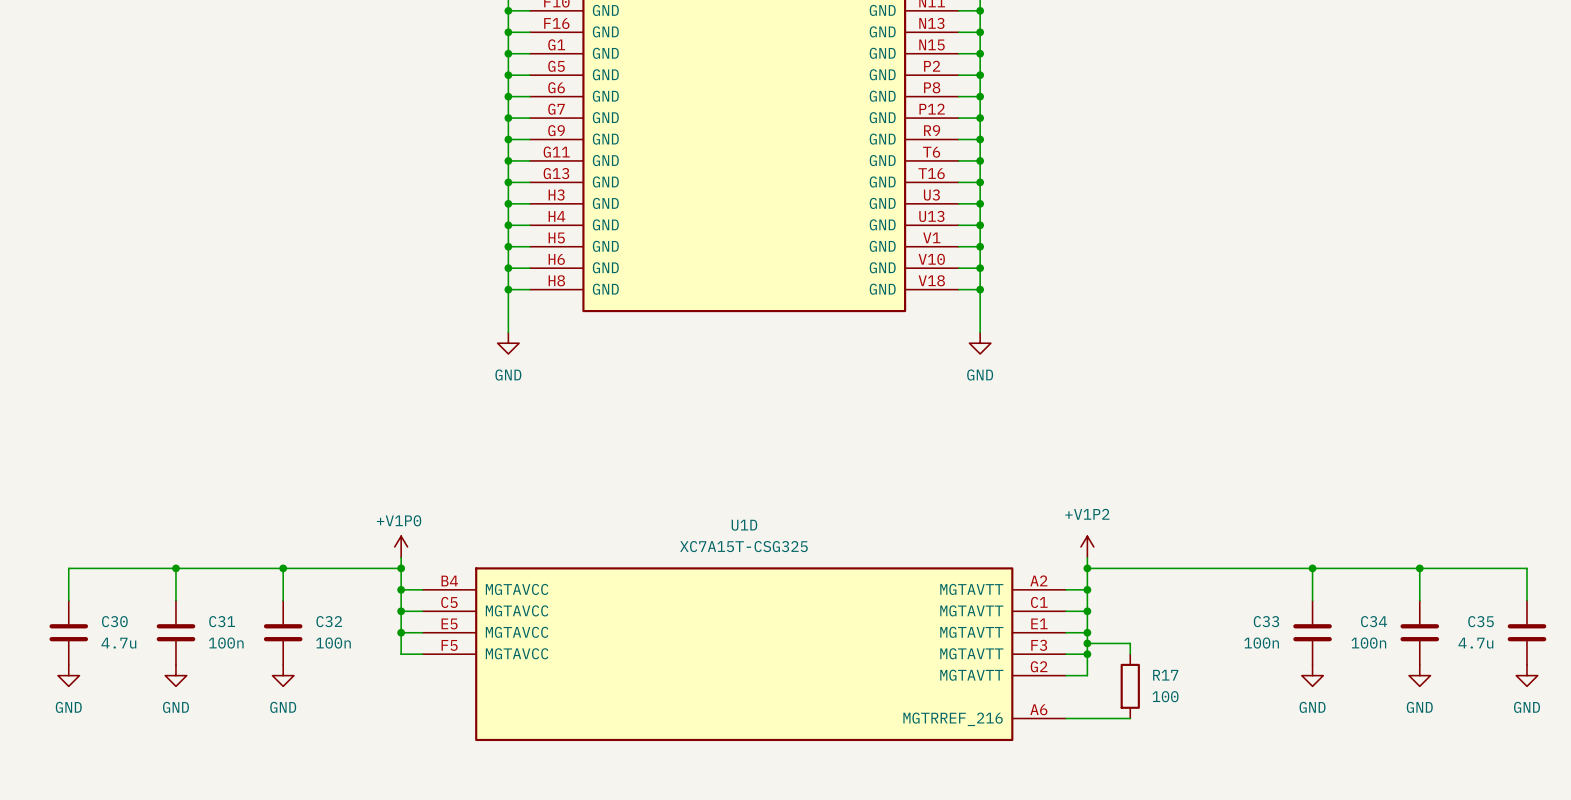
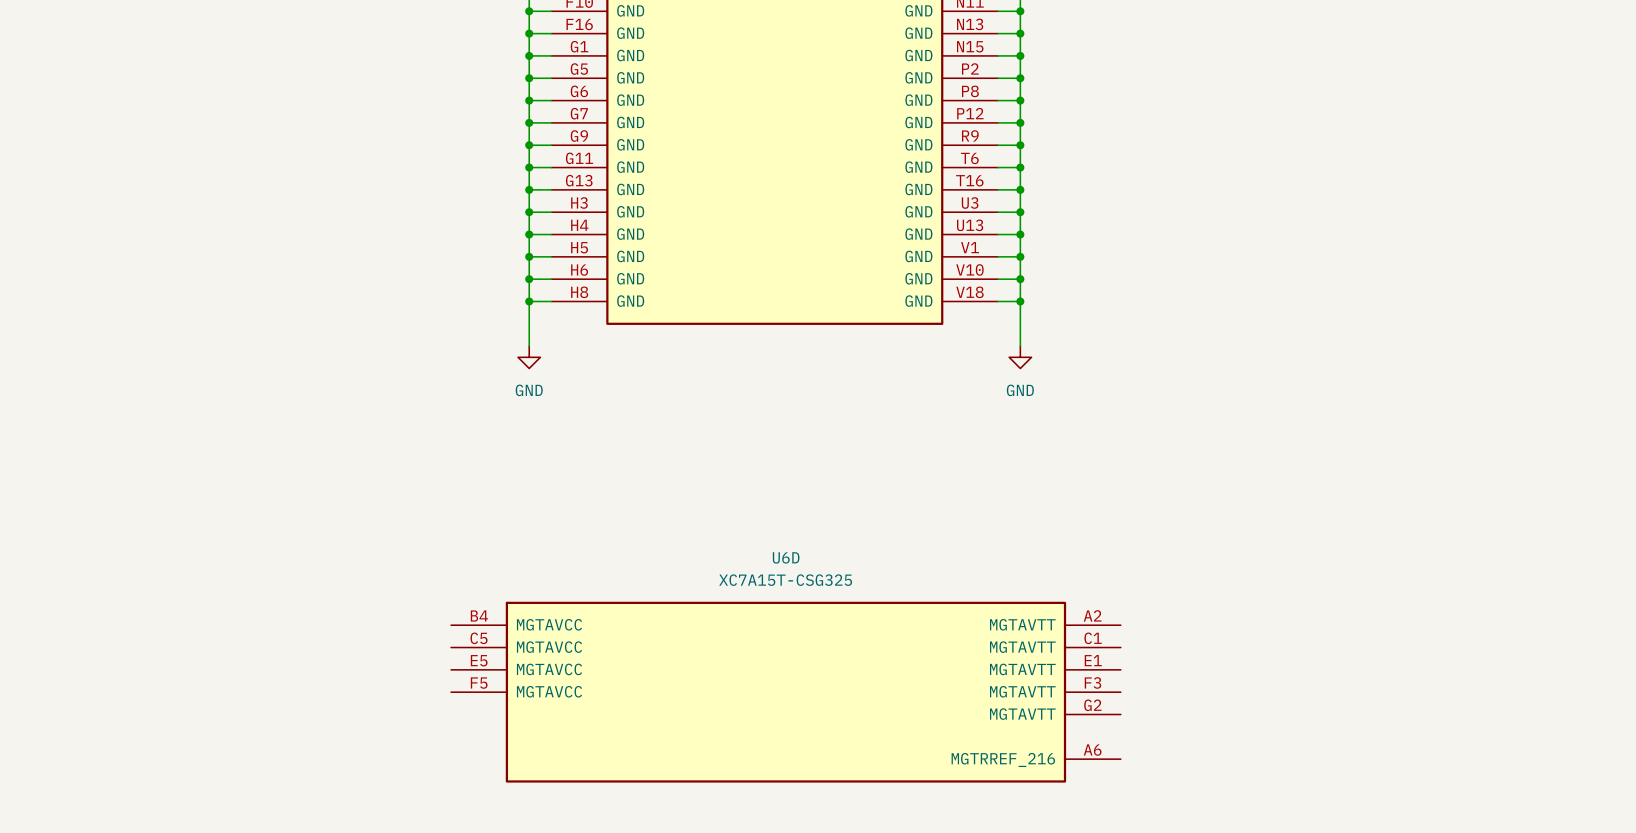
power symbol: +V1P0 (401, 546) -> none
power symbol: +V1P2 (1087, 546) -> none
wire: (401, 557) (401, 654) (422, 654) -> none
wire: (1087, 557) (1087, 675) (1065, 675) -> none
wire: (175, 568) (175, 600) -> none
junction: (175, 568) -> none
wire: (283, 568) (283, 600) -> none
junction: (283, 568) -> none
wire: (401, 568) (68, 568) (68, 600) -> none
junction: (401, 568) -> none
wire: (1087, 568) (1526, 568) (1526, 600) -> none
junction: (1087, 568) -> none
wire: (1312, 568) (1312, 600) -> none
junction: (1312, 568) -> none
wire: (1419, 568) (1419, 600) -> none
junction: (1419, 568) -> none
wire: (401, 589) (422, 589) -> none
junction: (401, 589) -> none
wire: (1065, 589) (1087, 589) -> none
junction: (1087, 589) -> none
wire: (401, 611) (422, 611) -> none
junction: (401, 611) -> none
wire: (1065, 611) (1087, 611) -> none
junction: (1087, 611) -> none
C30: 4.7u (68, 632) -> none
C31: 100n (175, 632) -> none
C32: 100n (283, 632) -> none
wire: (401, 632) (422, 632) -> none
junction: (401, 632) -> none
wire: (1065, 632) (1087, 632) -> none
junction: (1087, 632) -> none
C33: 100n (1312, 632) -> none
C34: 100n (1419, 632) -> none
C35: 4.7u (1526, 632) -> none
wire: (1087, 643) (1130, 643) (1130, 654) -> none
junction: (1087, 643) -> none
U1D: XC7A15T-CSG325 (744, 654) -> none
wire: (1065, 654) (1087, 654) -> none
junction: (1087, 654) -> none
U6D: none -> XC7A15T-CSG325 (785, 692)
power symbol: GND (68, 675) -> none
power symbol: GND (175, 675) -> none
power symbol: GND (283, 675) -> none
power symbol: GND (1312, 675) -> none
power symbol: GND (1419, 675) -> none
power symbol: GND (1526, 675) -> none
R17: 100 (1130, 686) -> none
wire: (1065, 718) (1130, 718) -> none

